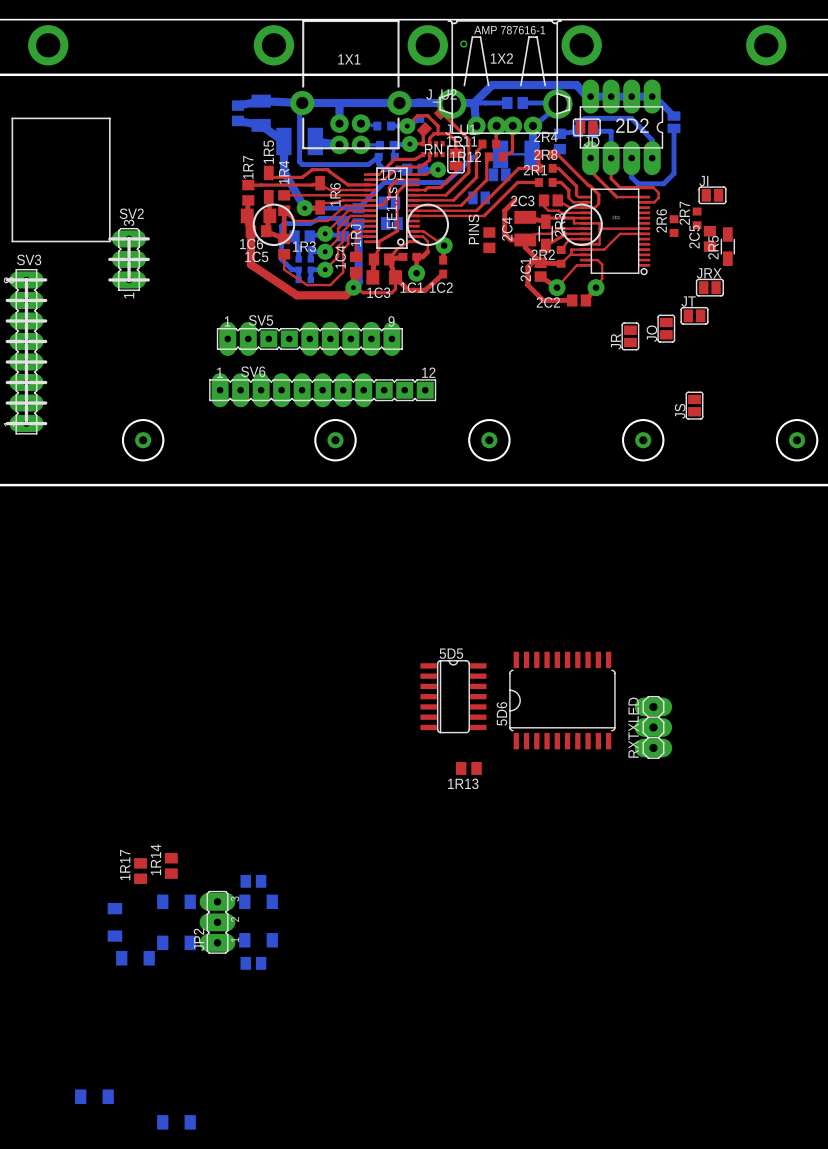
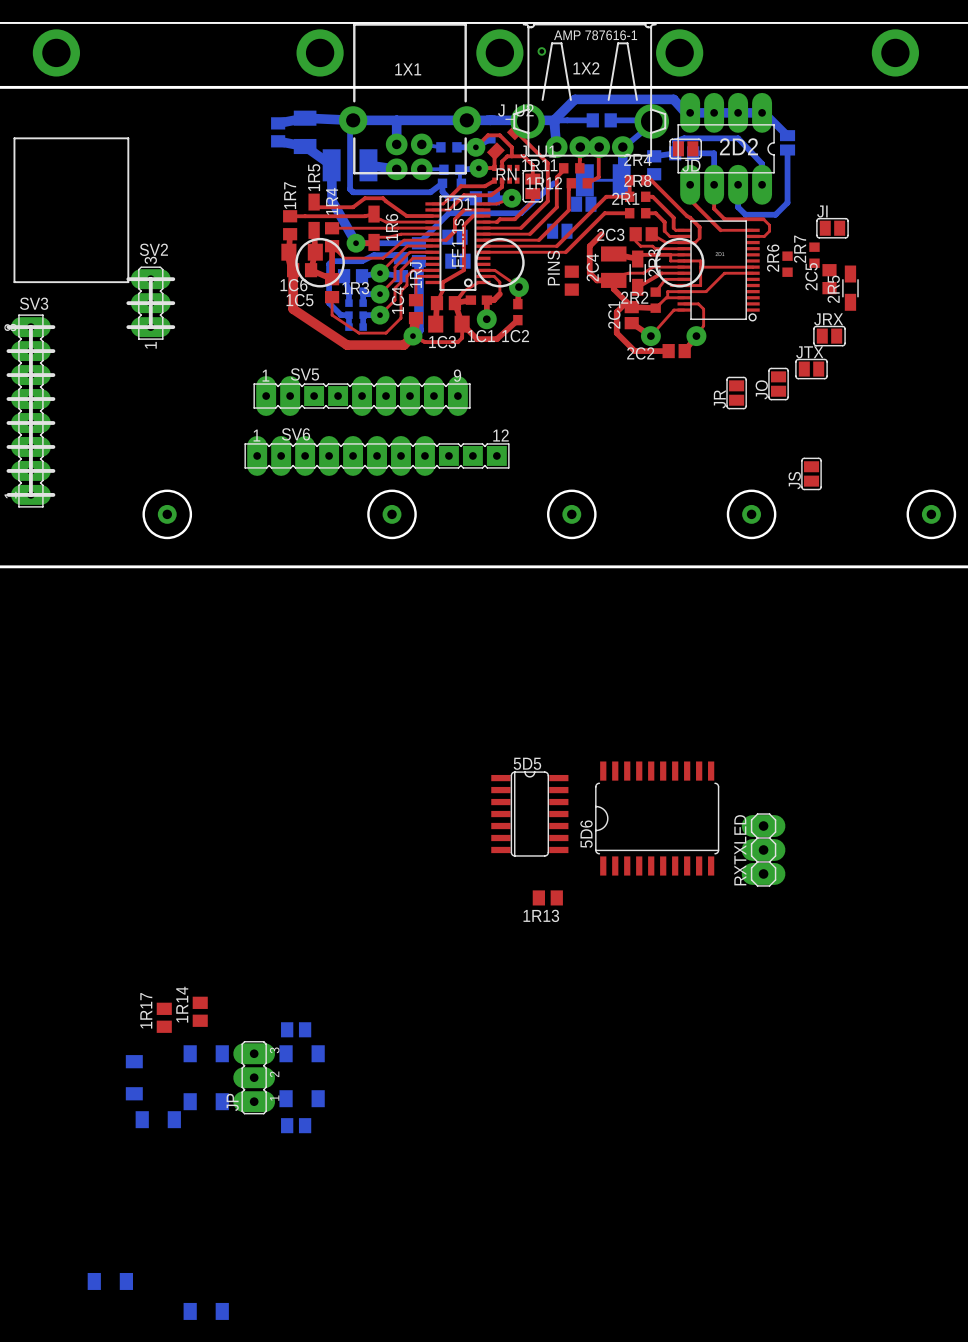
JT name: JT (688, 301) -> JTX (809, 352)
JP2 name: JP2 (199, 939) -> JP (232, 1102)

